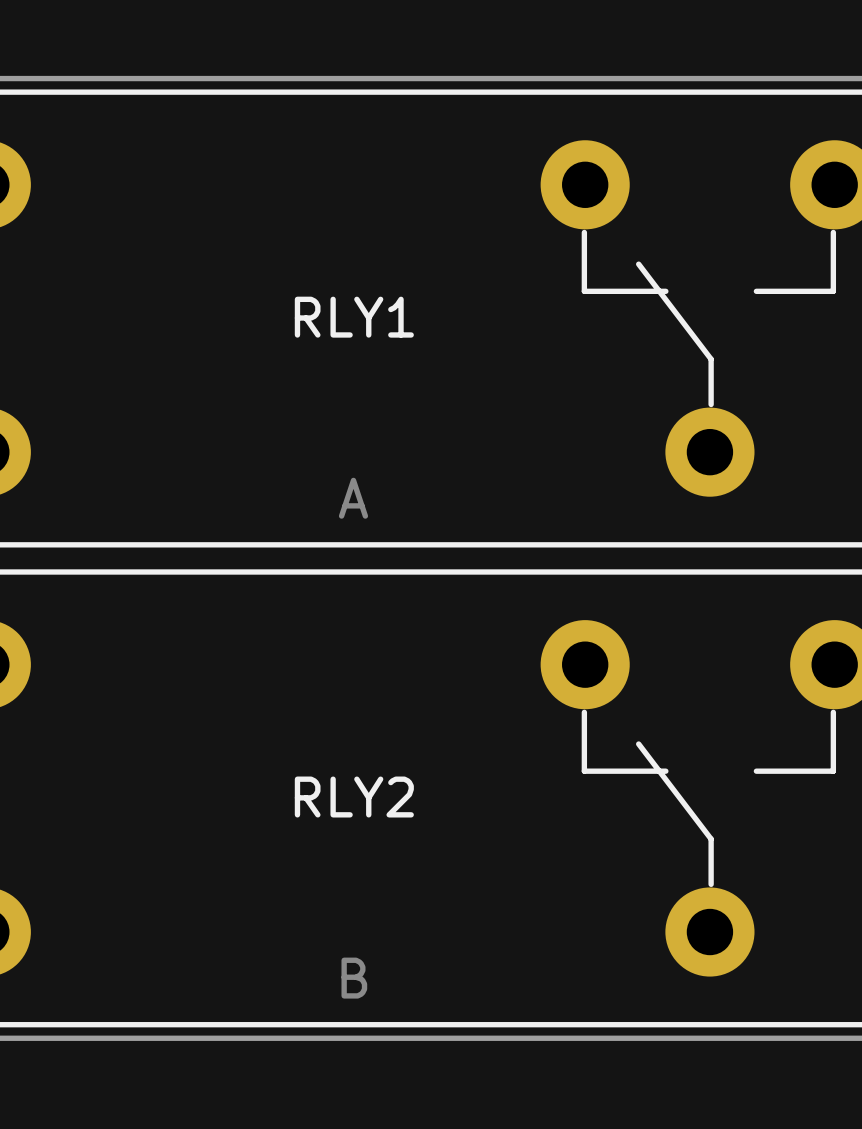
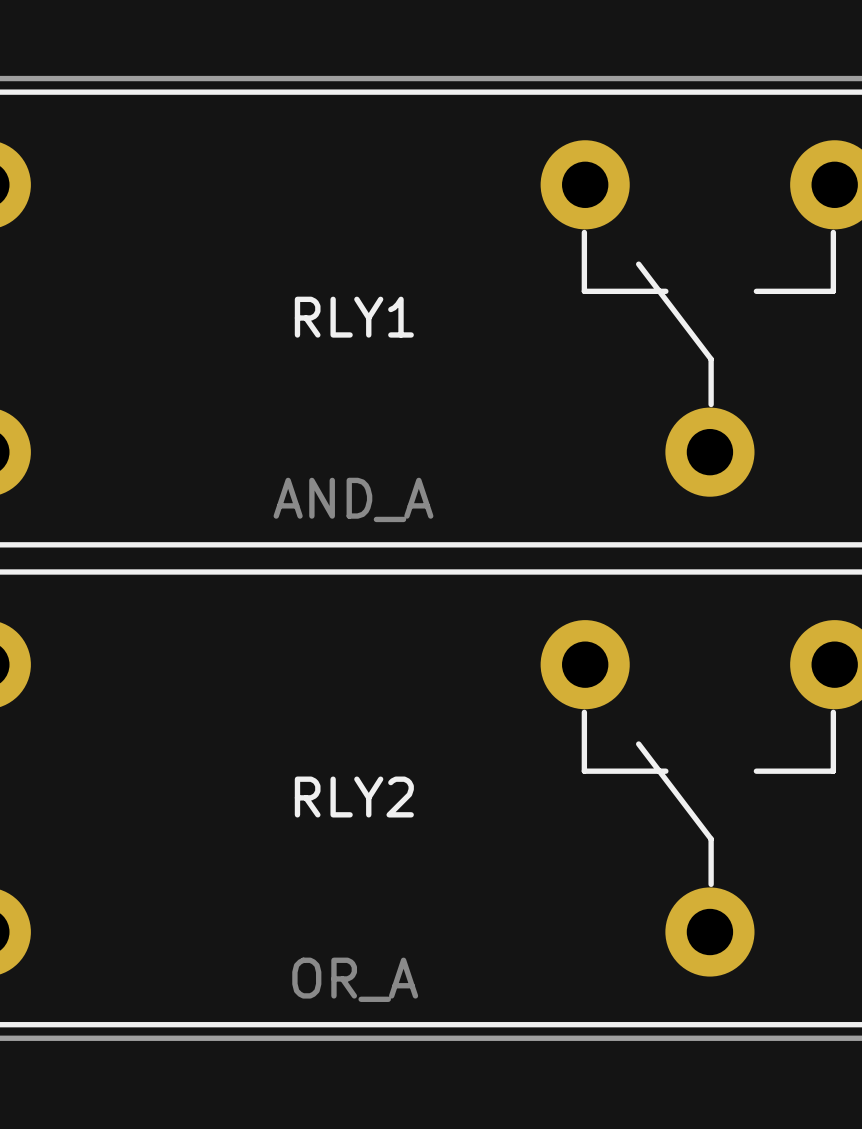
RLY1 value: A (353, 498) -> AND_A (353, 499)
RLY2 value: B (354, 978) -> OR_A (355, 979)

